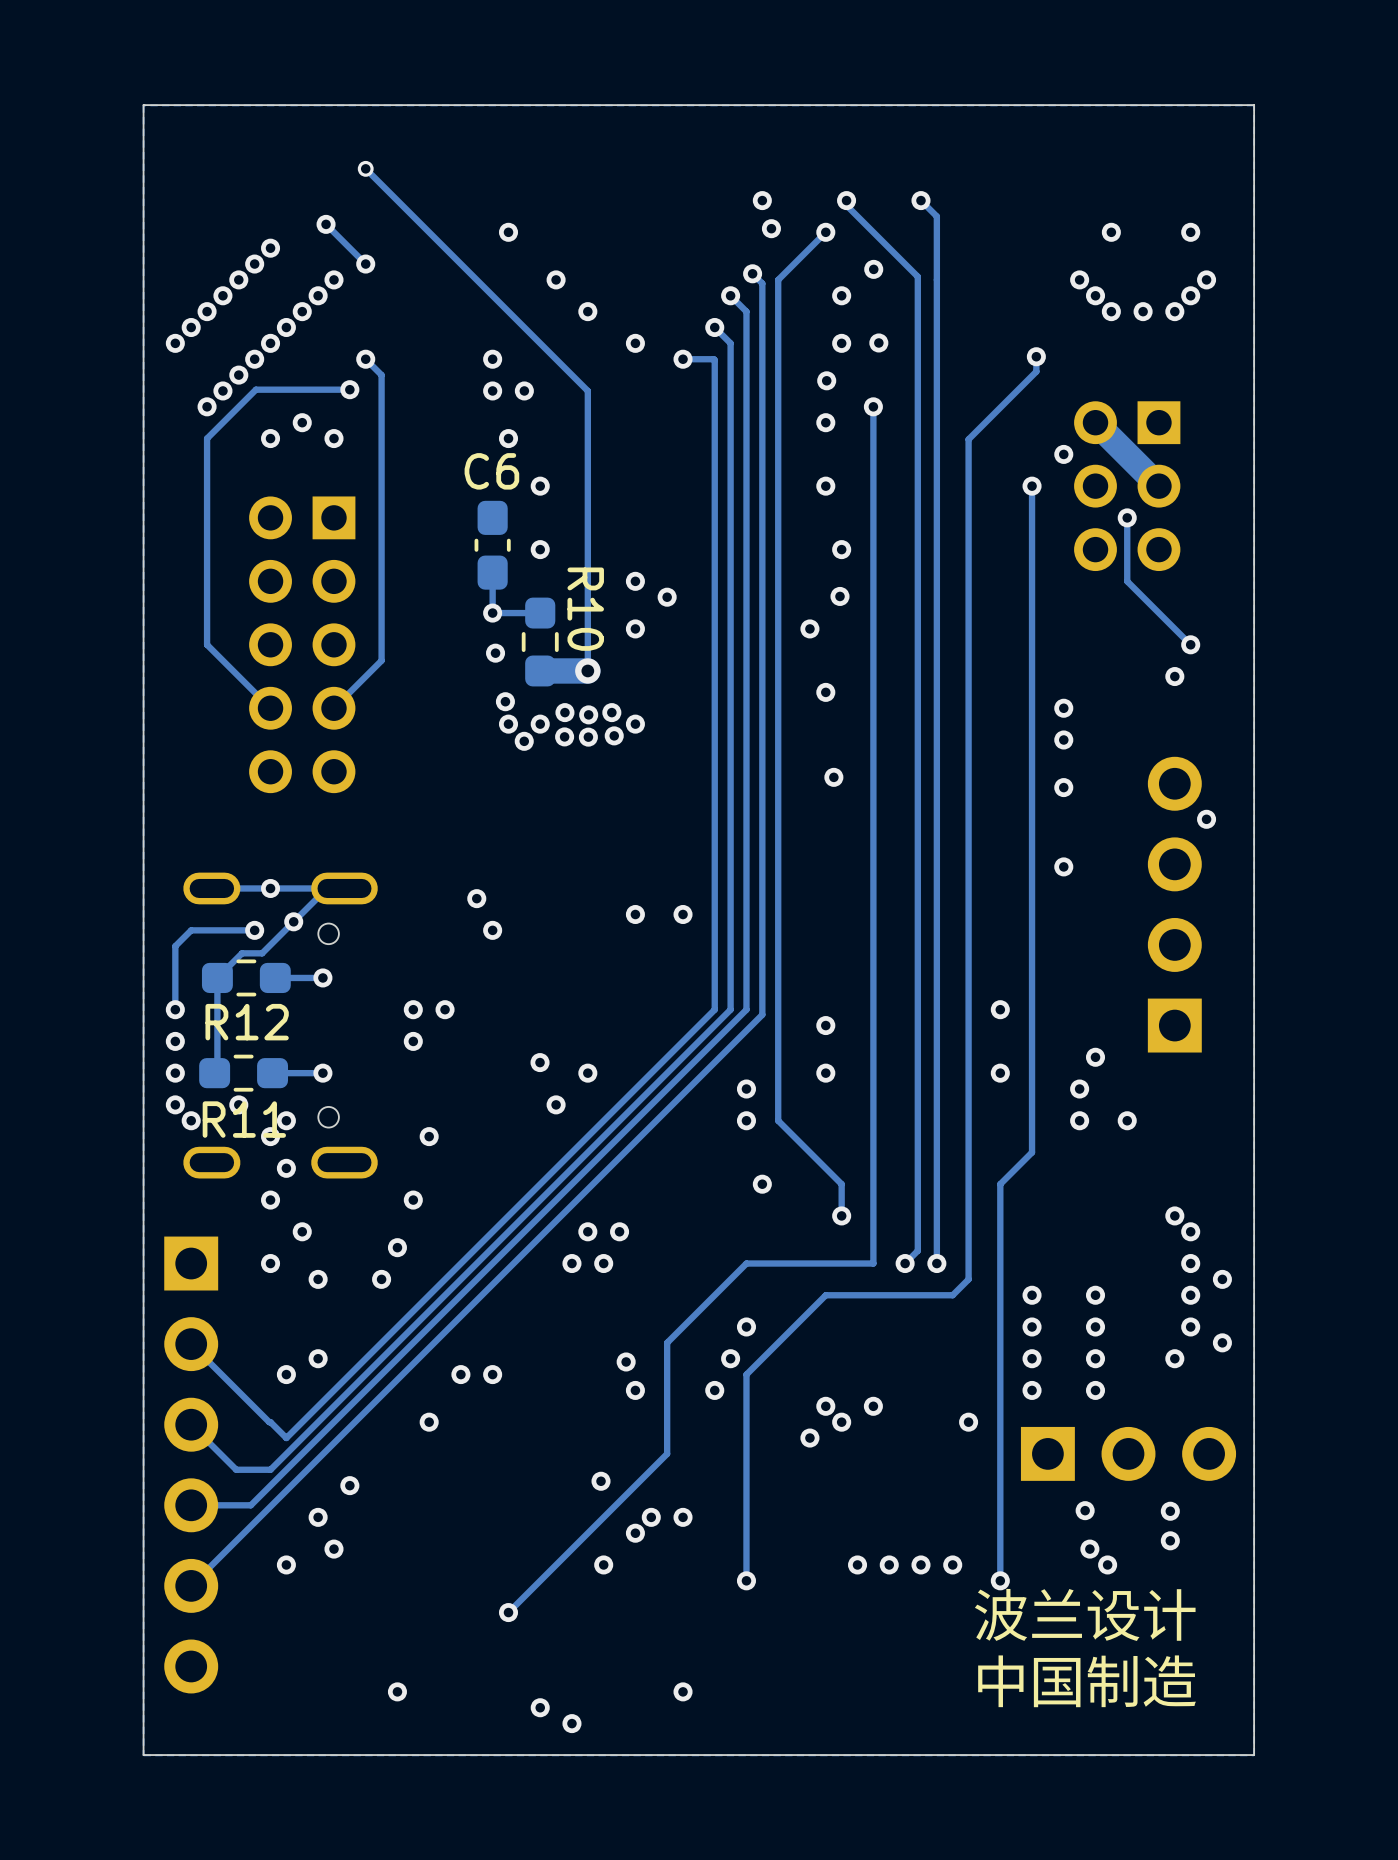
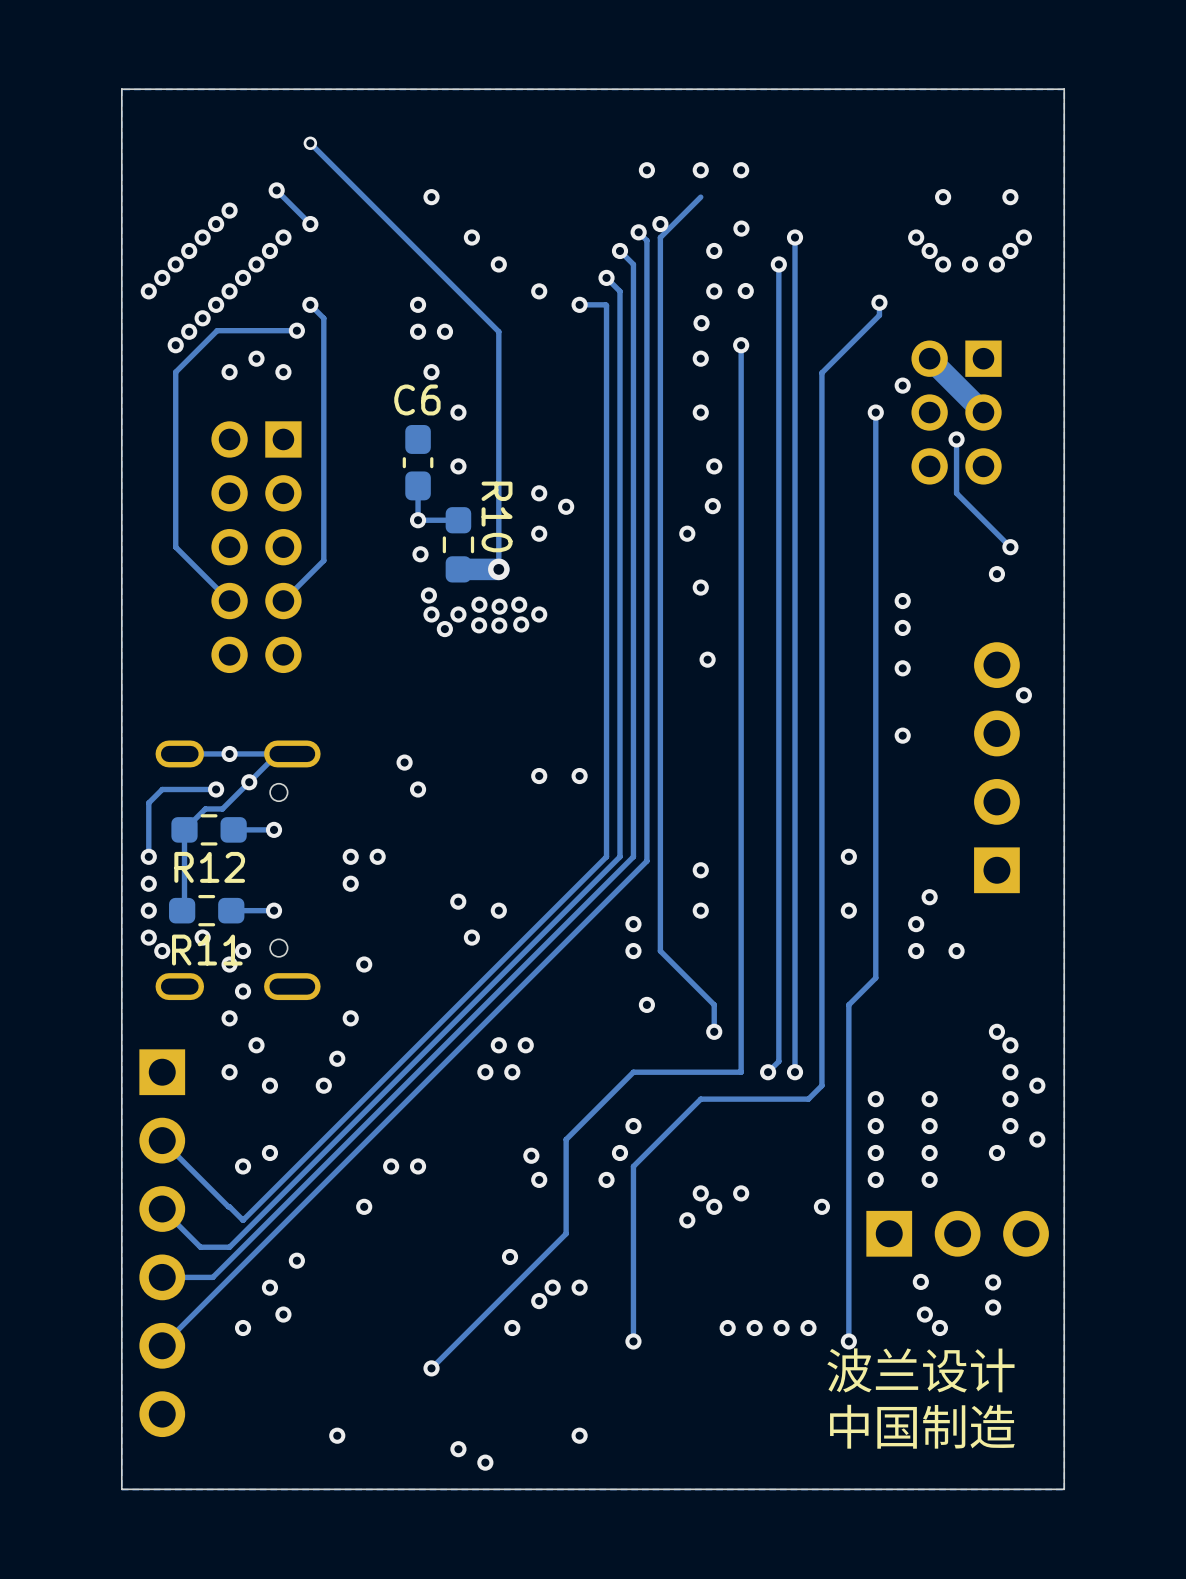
via: none -> (700, 170)
track: (846, 200) (846, 205) (917, 276) (917, 311) -> none
via: (846, 200) -> none
via: none -> (741, 170)
track: (920, 200) (936, 216) (936, 279) -> none
via: (920, 200) -> none
via: (771, 228) -> none
via: (825, 232) -> none
via: none -> (660, 224)
via: none -> (795, 237)
via: none -> (778, 264)

